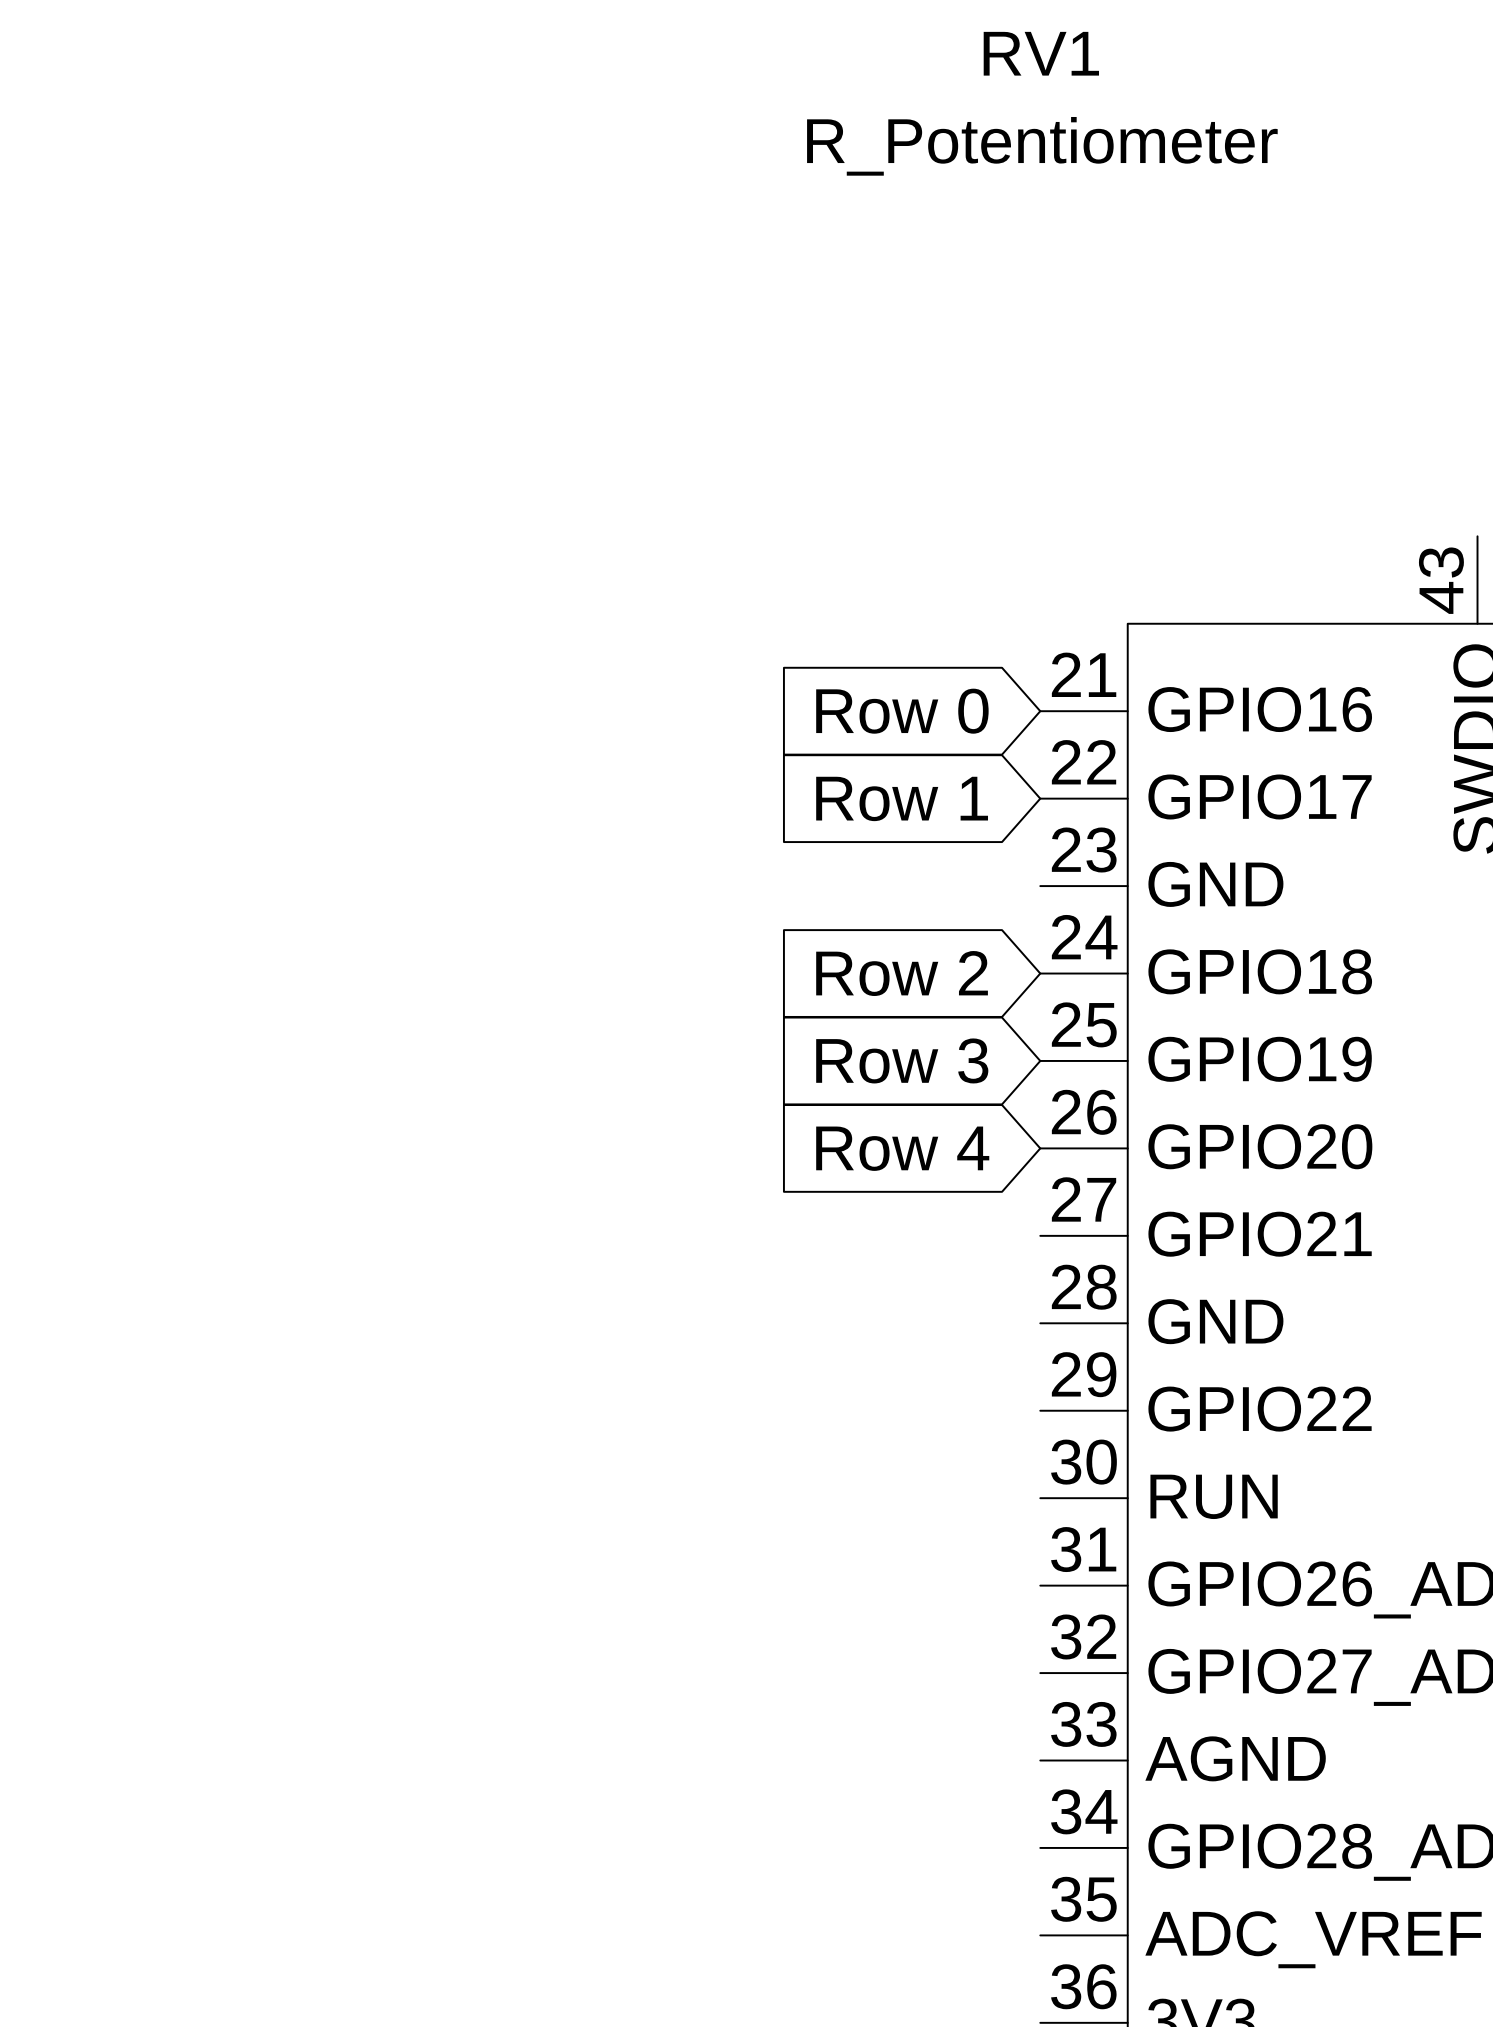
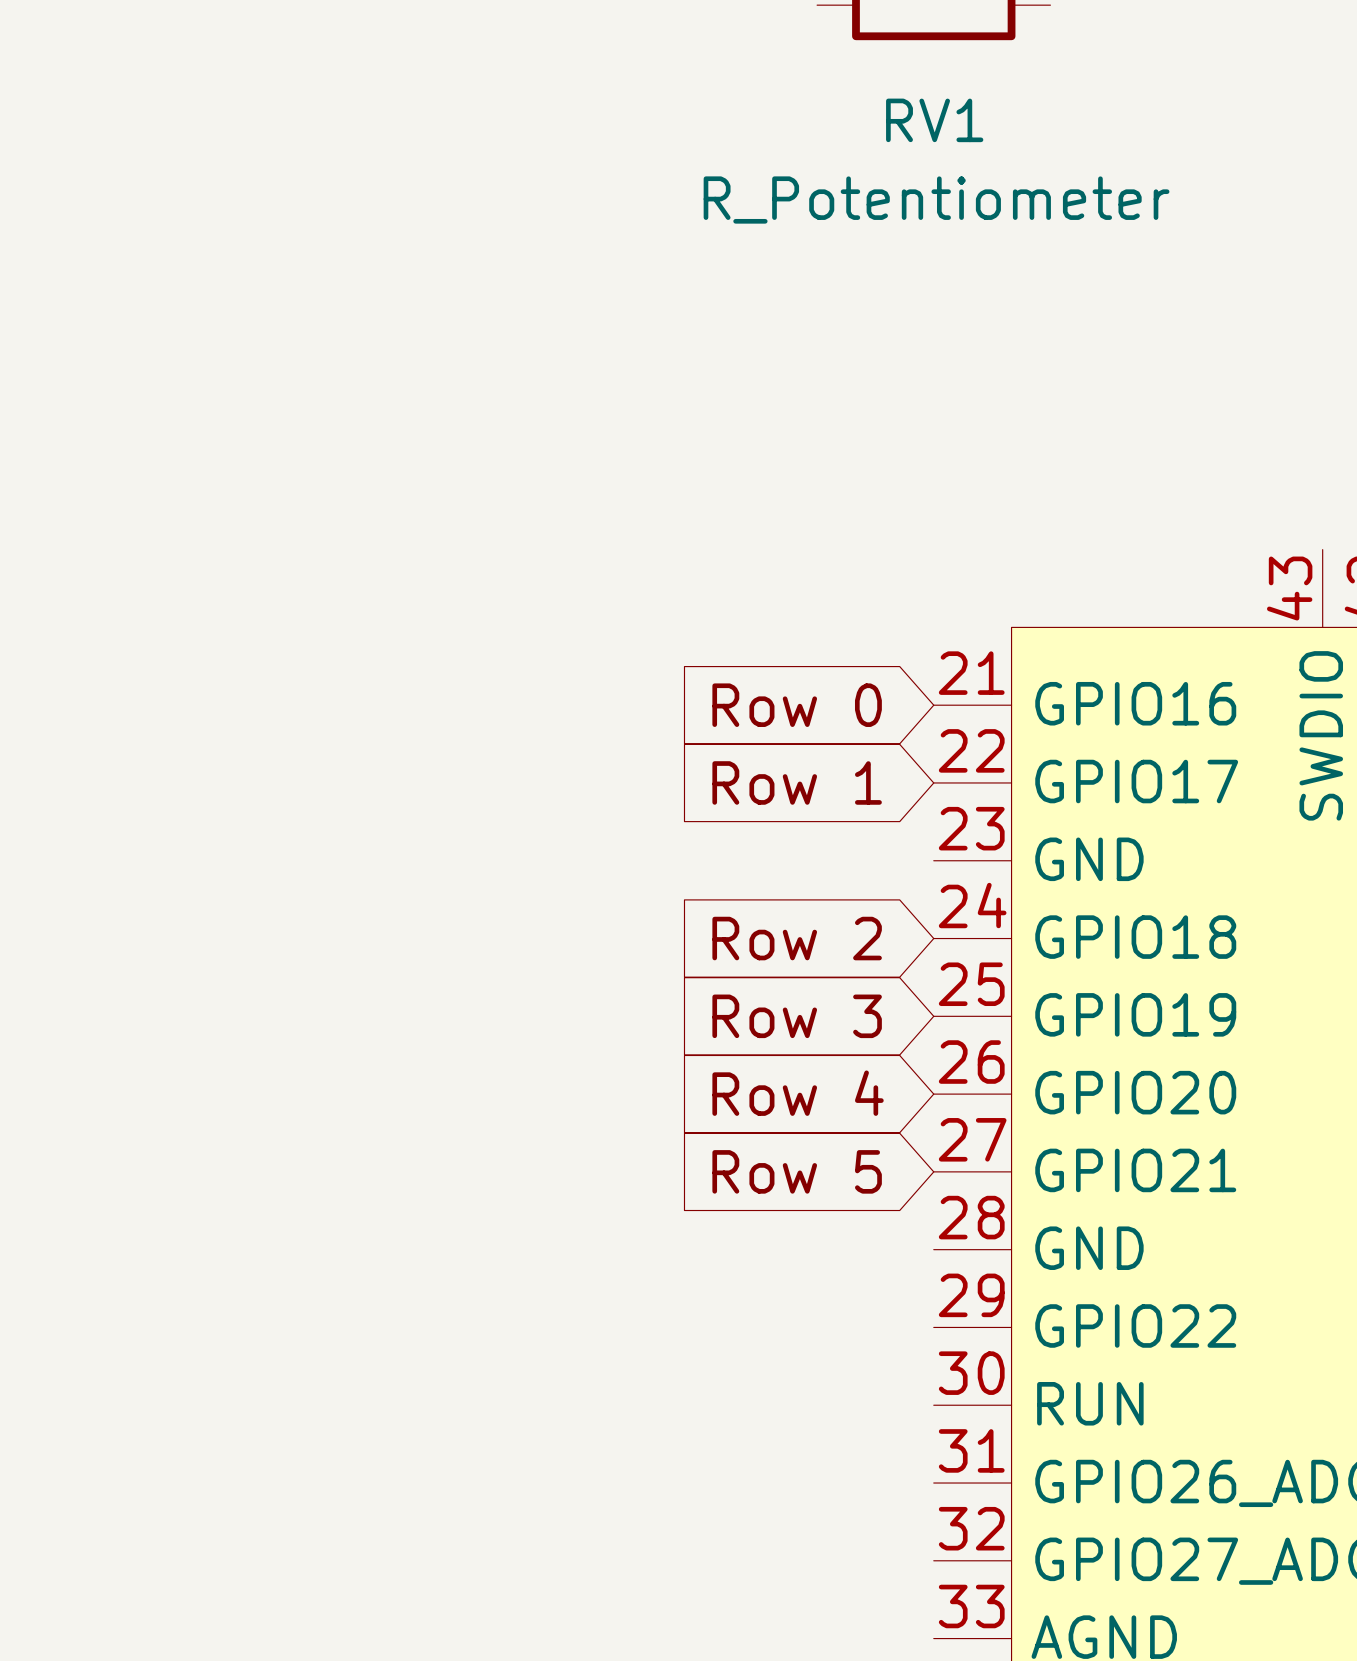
global label: none -> Row 5 (797, 1171)

